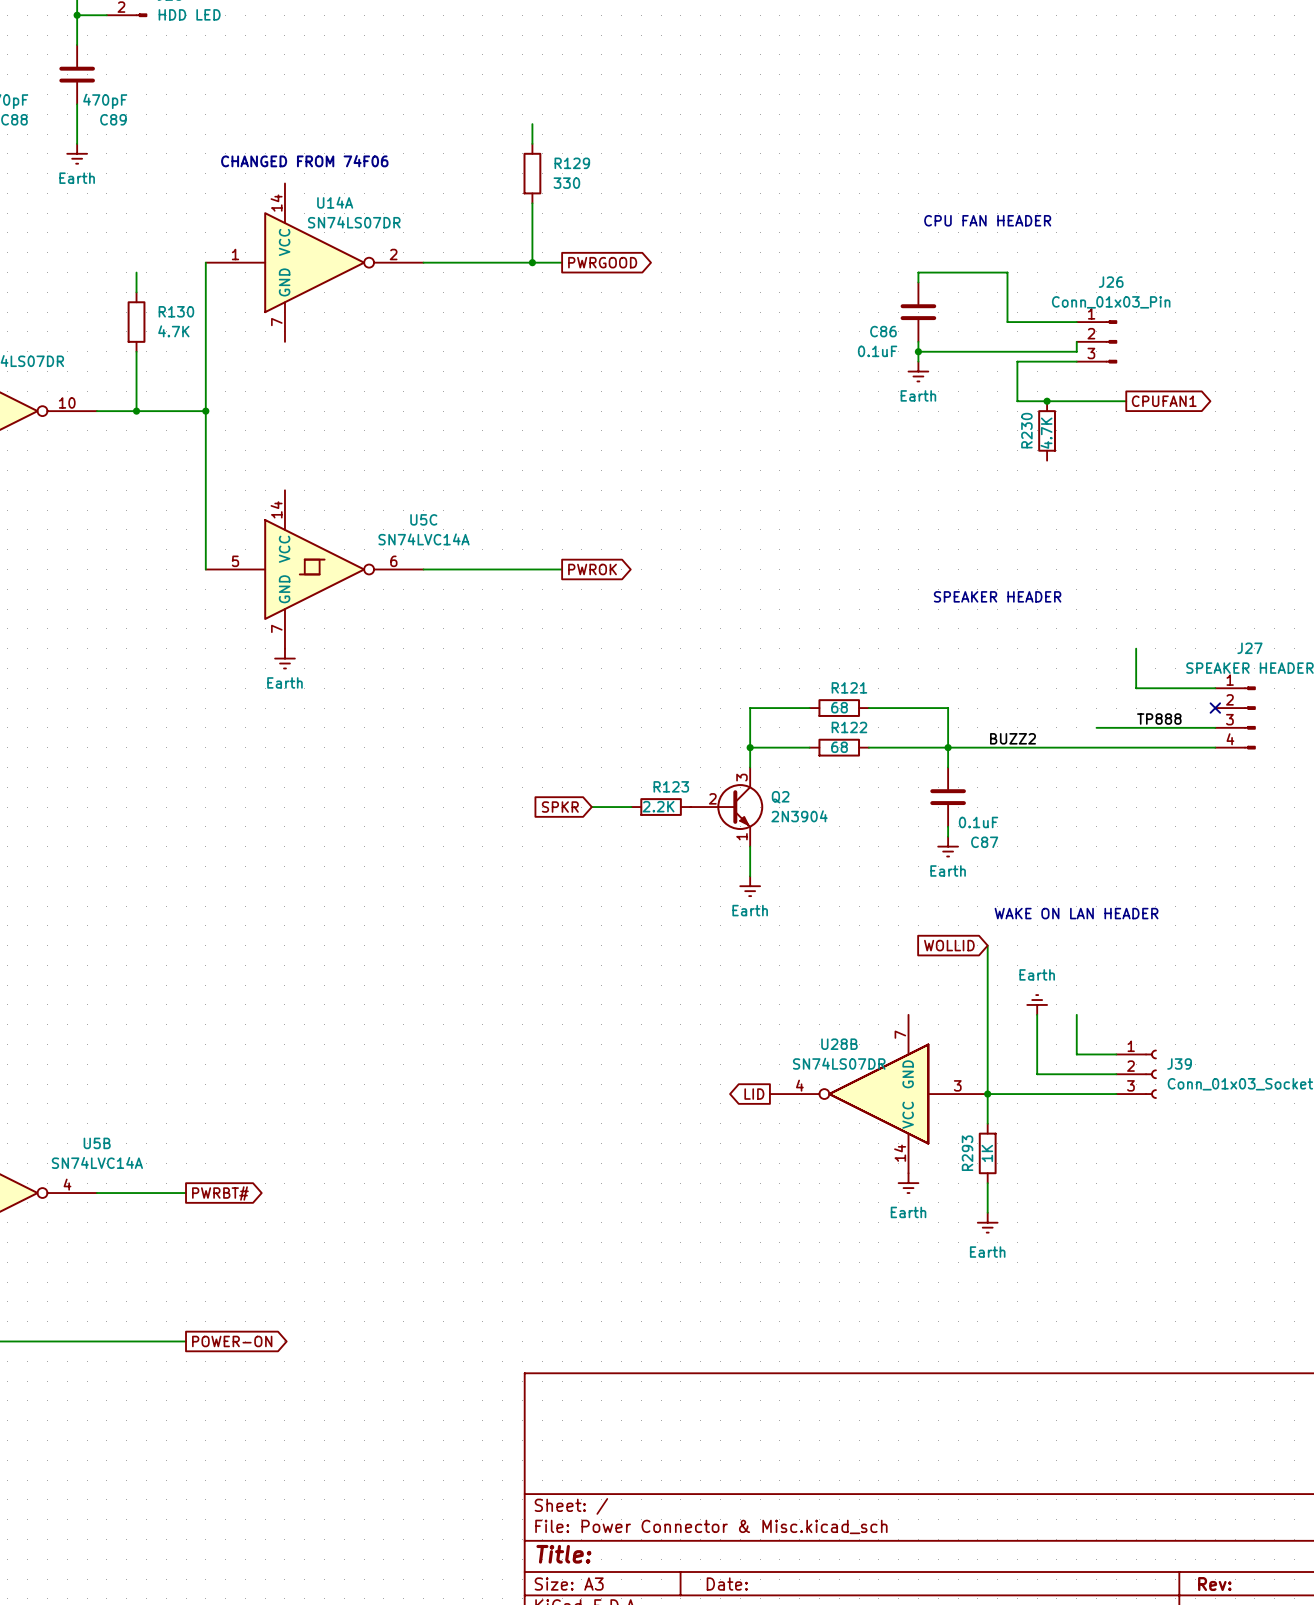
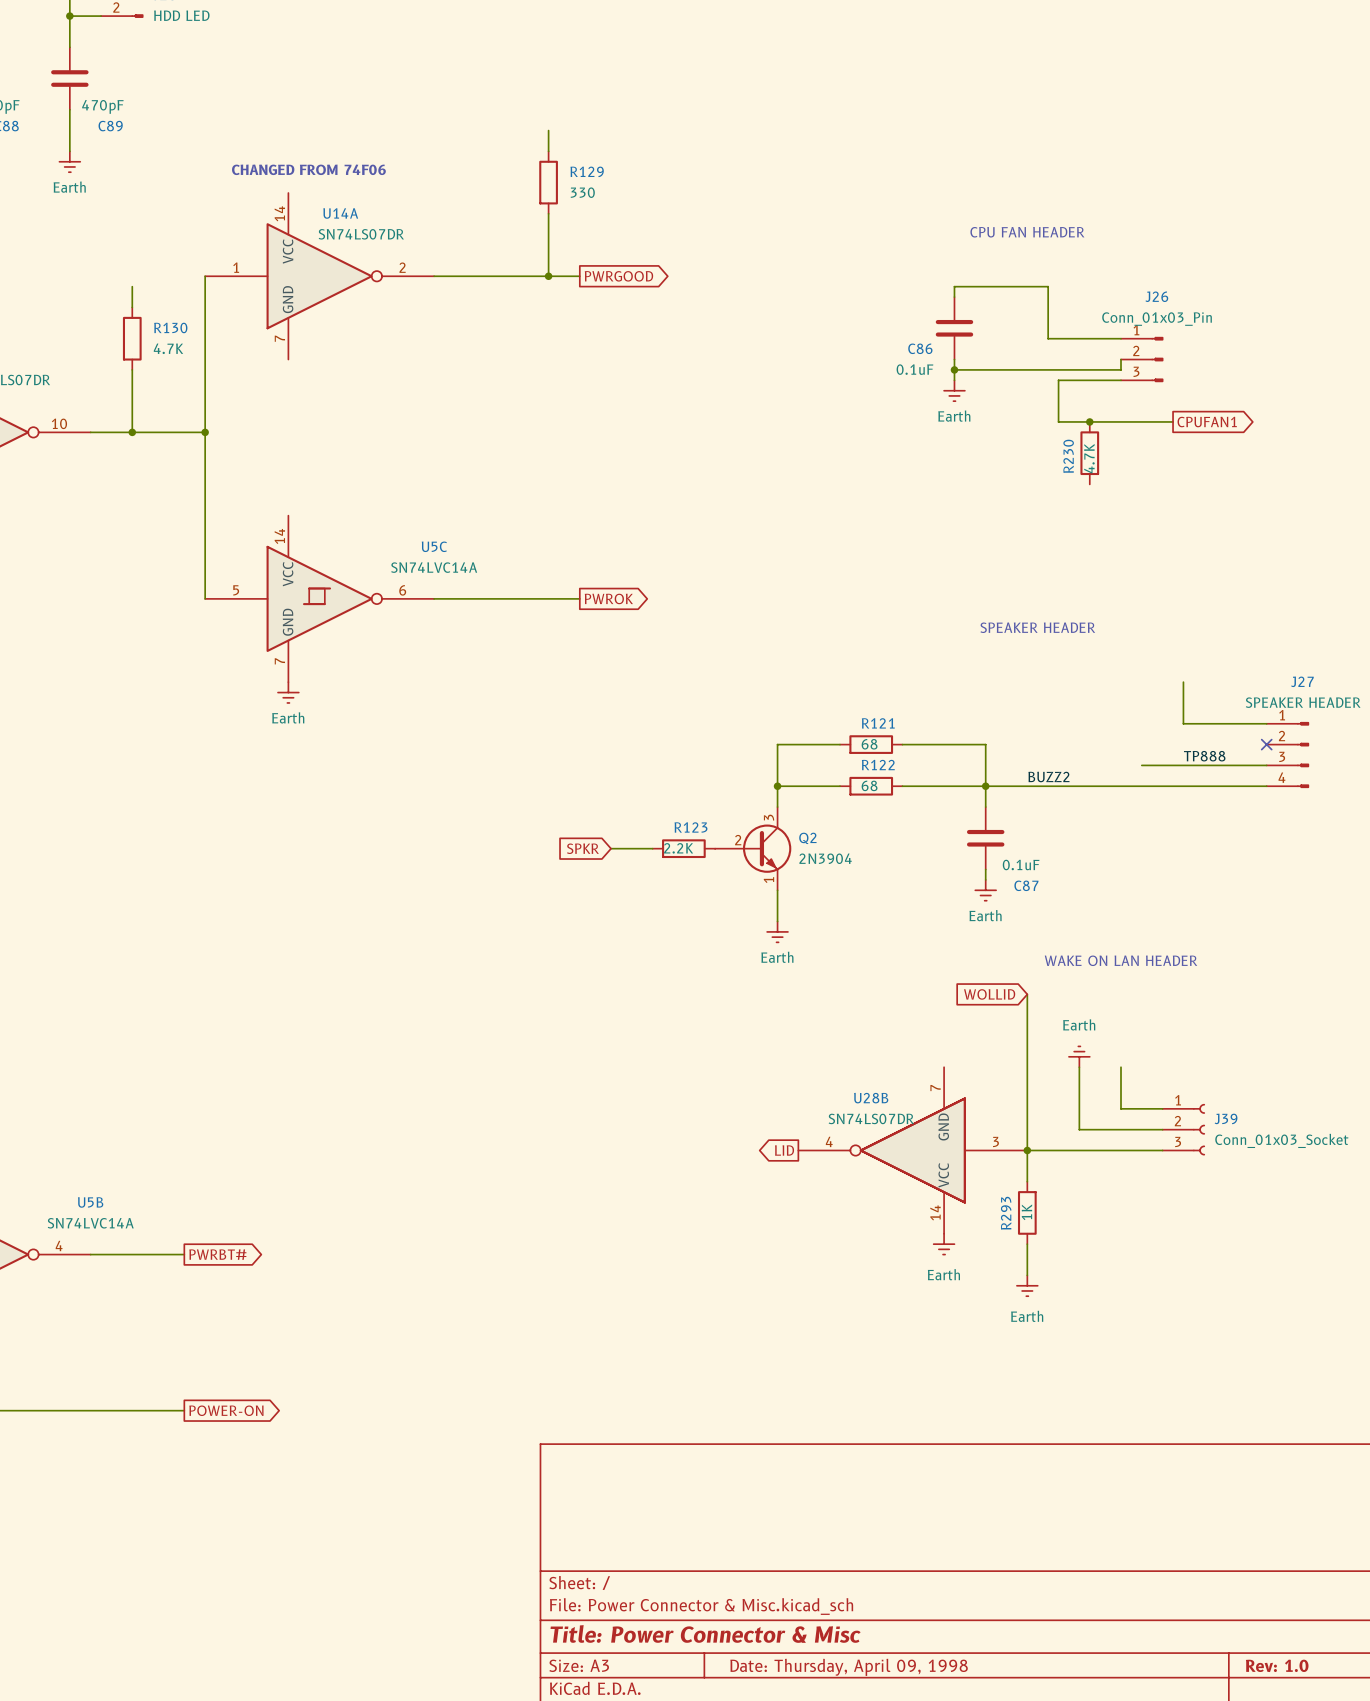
title block: Title: (563, 1554) -> Title: Power Connector & Misc (705, 1633)
title block: Date: (727, 1584) -> Date: Thursday, April 09, 1998 (849, 1667)
title block: Rev: (1214, 1584) -> Rev: 1.0 (1277, 1665)

